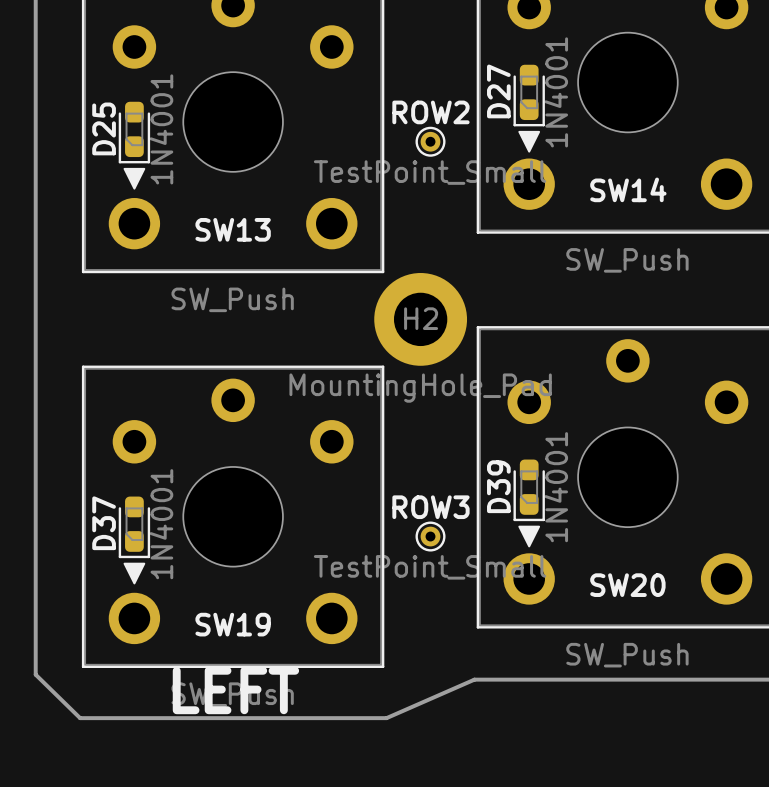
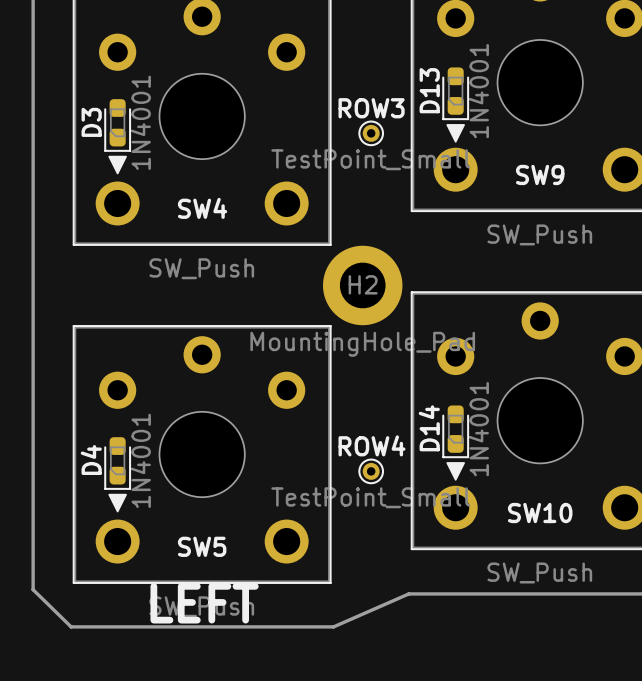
D27 name: D27 (498, 91) -> D13 (429, 90)
ROW2 name: ROW2 (430, 112) -> ROW3 (371, 108)
D25 name: D25 (104, 128) -> D3 (91, 122)
SW14 name: SW14 (628, 189) -> SW9 (540, 174)
SW13 name: SW13 (233, 229) -> SW4 (202, 208)
D39 name: D39 (498, 486) -> D14 (429, 428)
ROW3 name: ROW3 (430, 507) -> ROW4 (371, 445)
D37 name: D37 (104, 523) -> D4 (91, 460)
SW20 name: SW20 (627, 585) -> SW10 (540, 513)
SW19 name: SW19 (233, 624) -> SW5 (202, 546)

